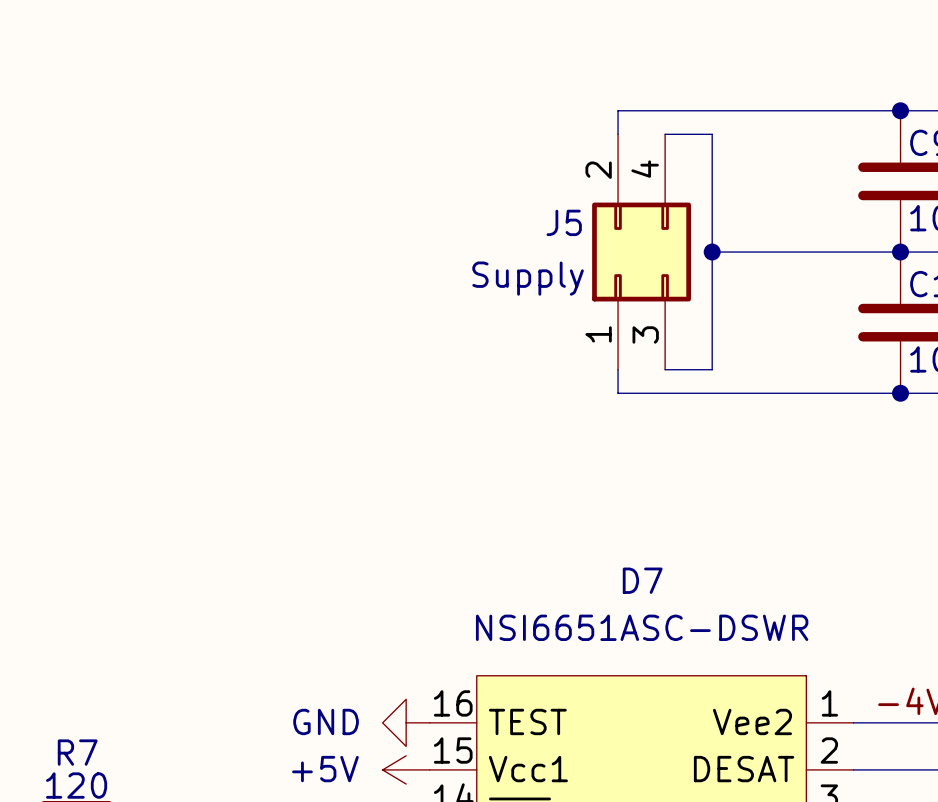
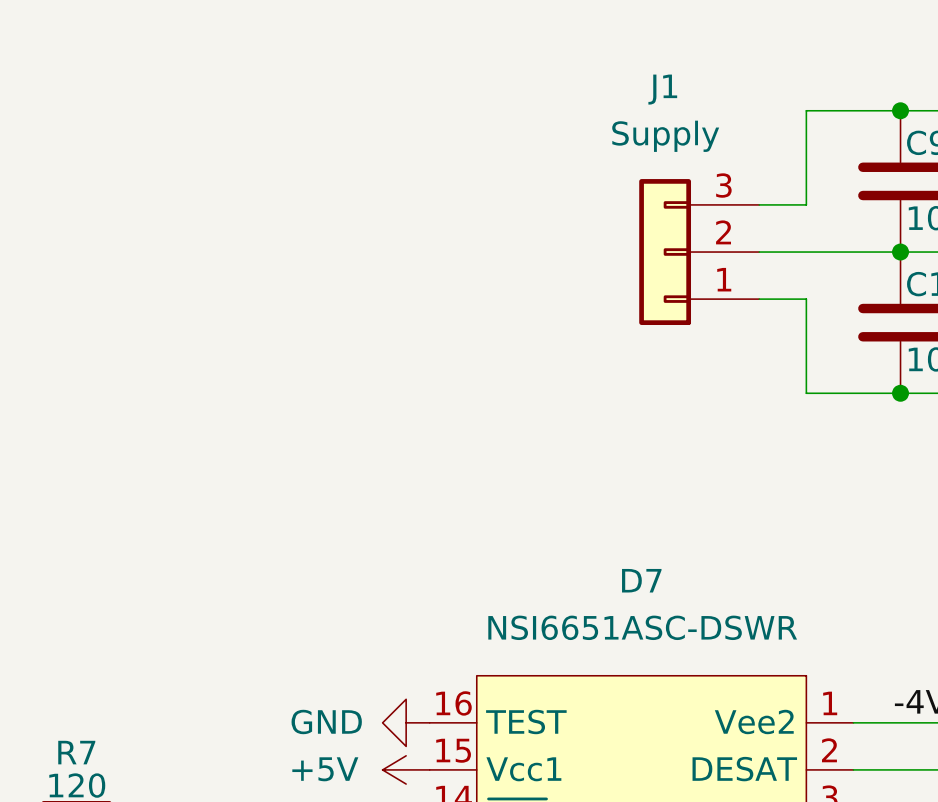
wire: (806, 110) (618, 110) (618, 134) -> (806, 110) (806, 204) (759, 204)
wire: (665, 134) (712, 134) (712, 369) (665, 369) -> none
J5: Supply (641, 252) -> none
J1: none -> Supply (699, 252)
junction: (712, 252) -> none
wire: (618, 369) (618, 393) (806, 393) -> (759, 299) (806, 299) (806, 393)

